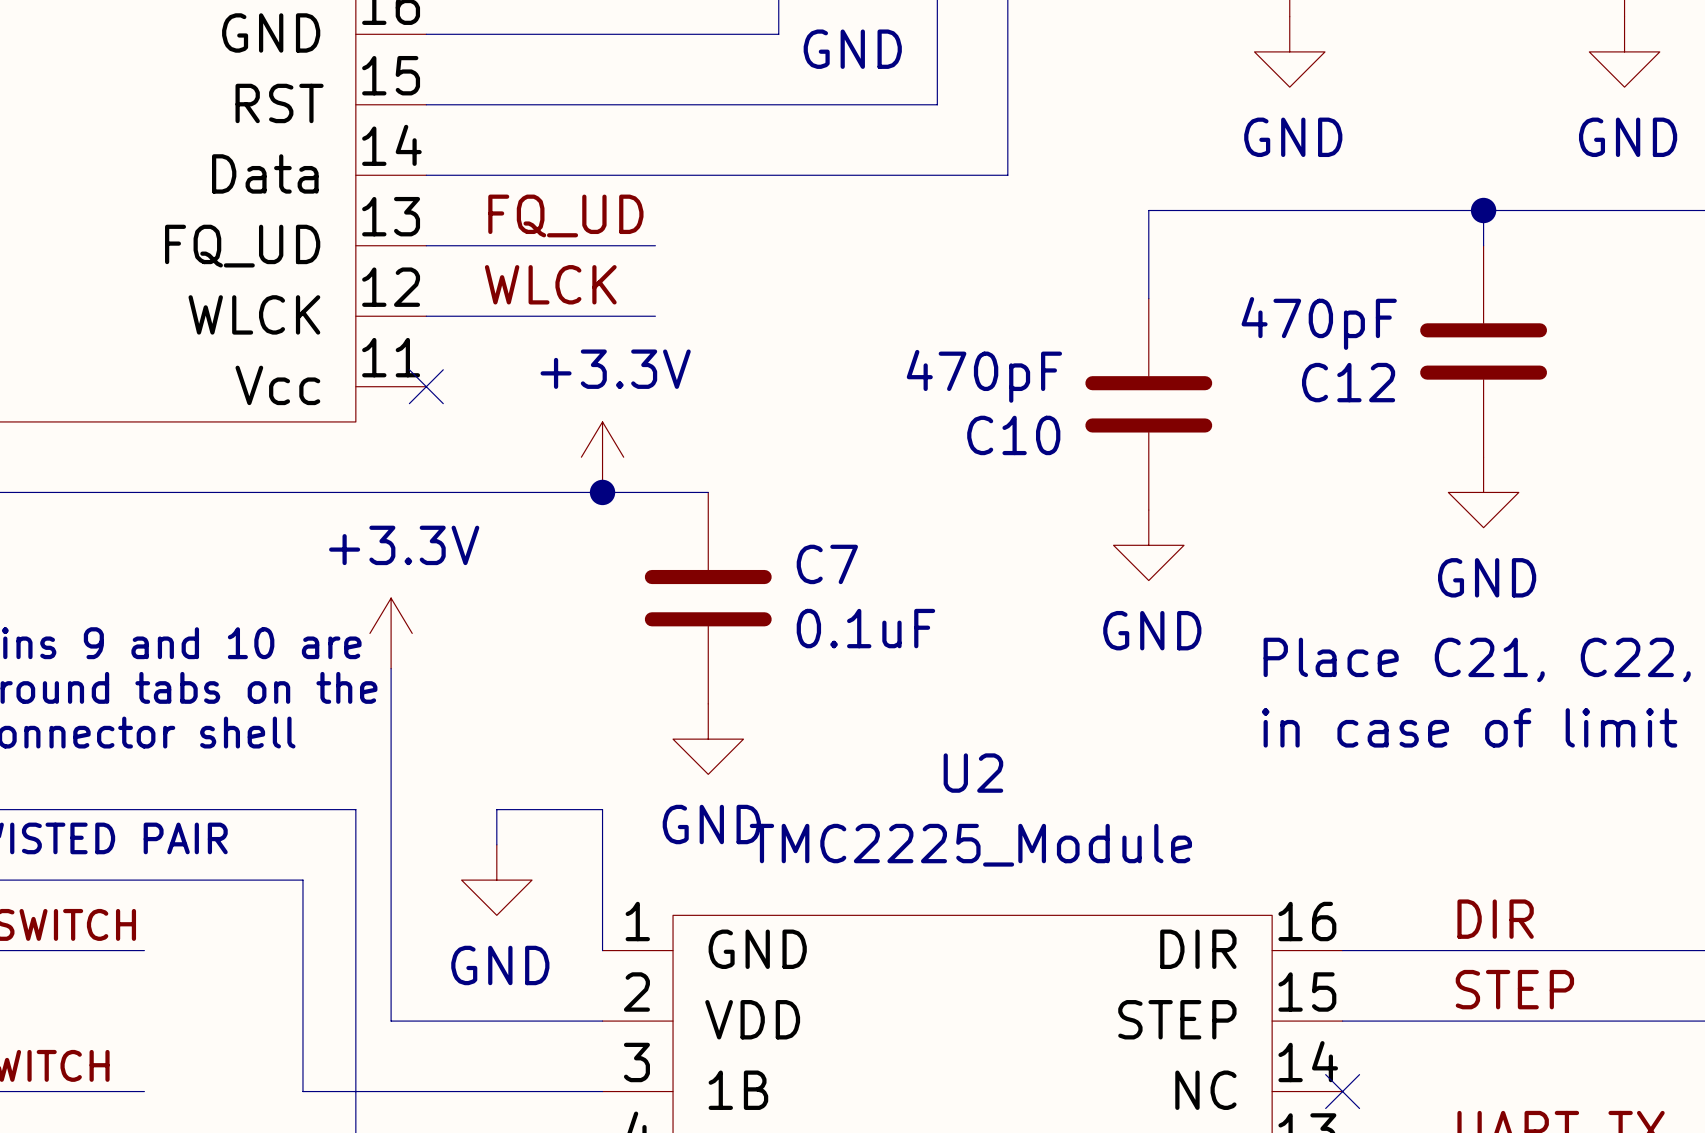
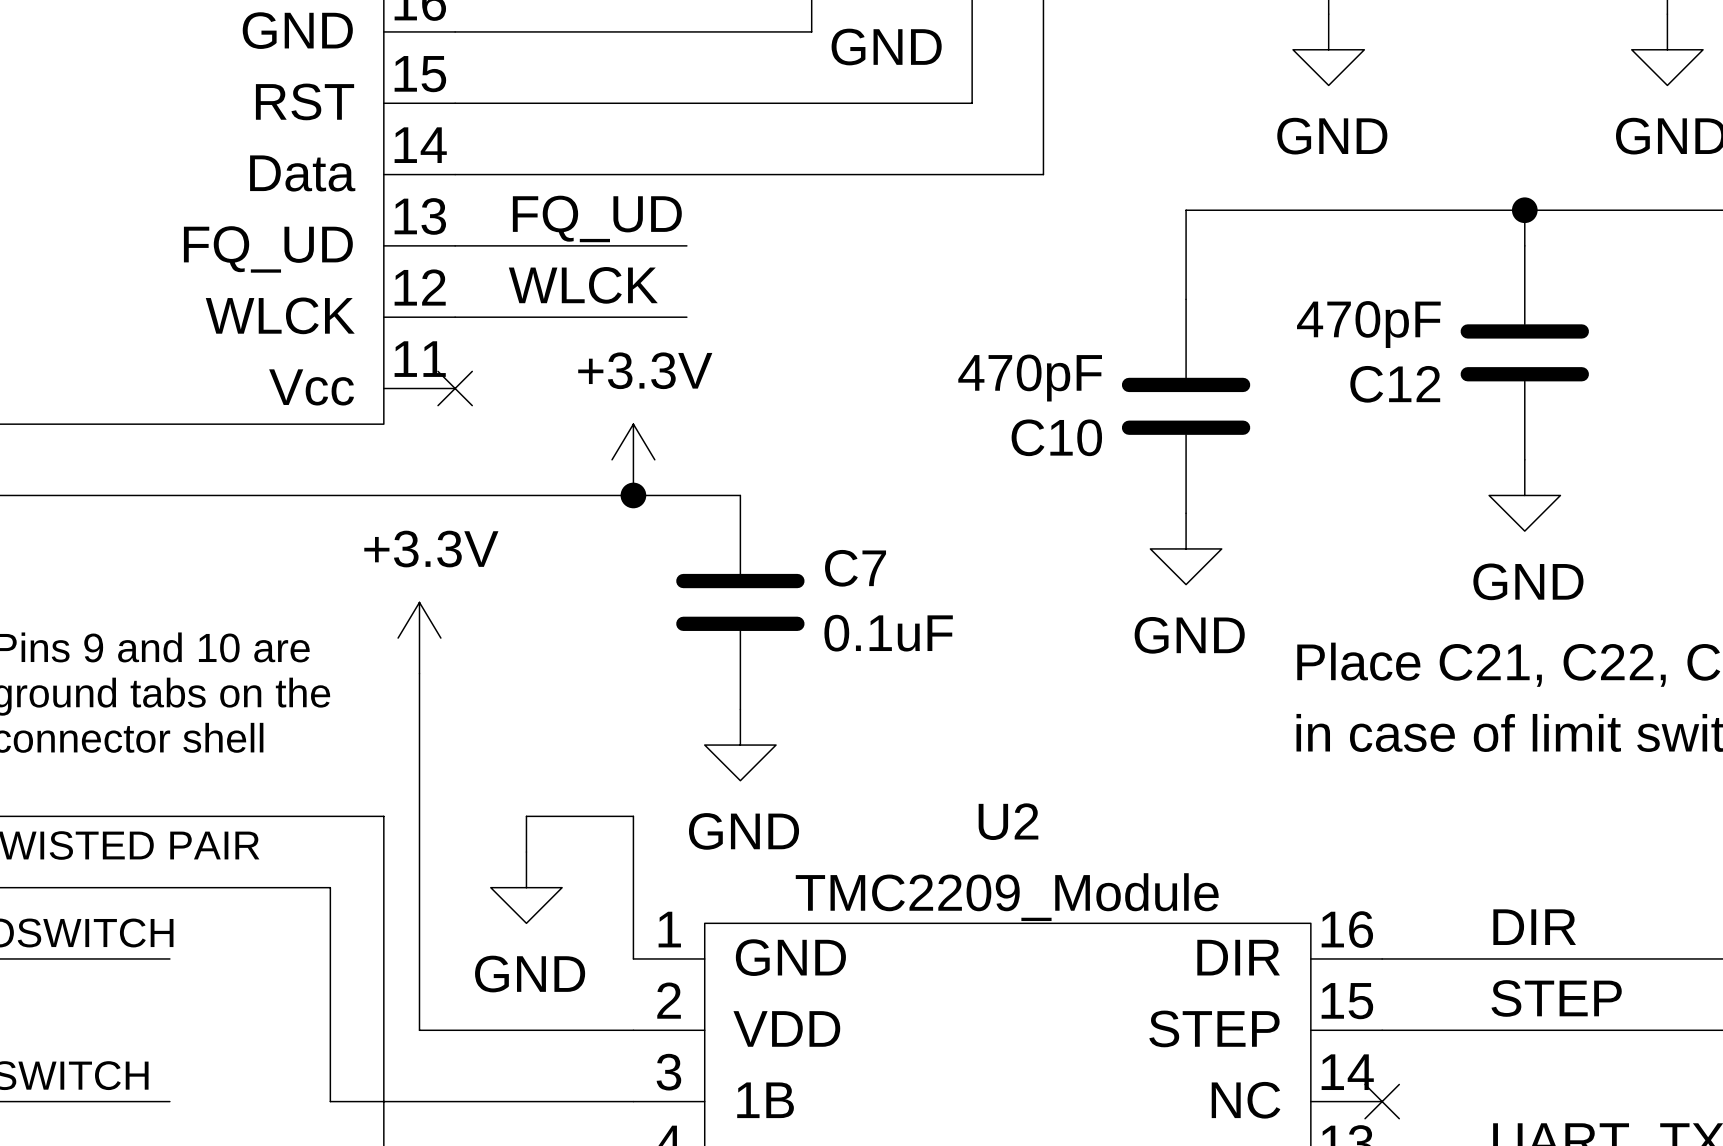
U2 name position: U2 (973, 773) -> U2 (1008, 821)
U2 value: TMC2225_Module (970, 845) -> TMC2209_Module (1007, 897)

